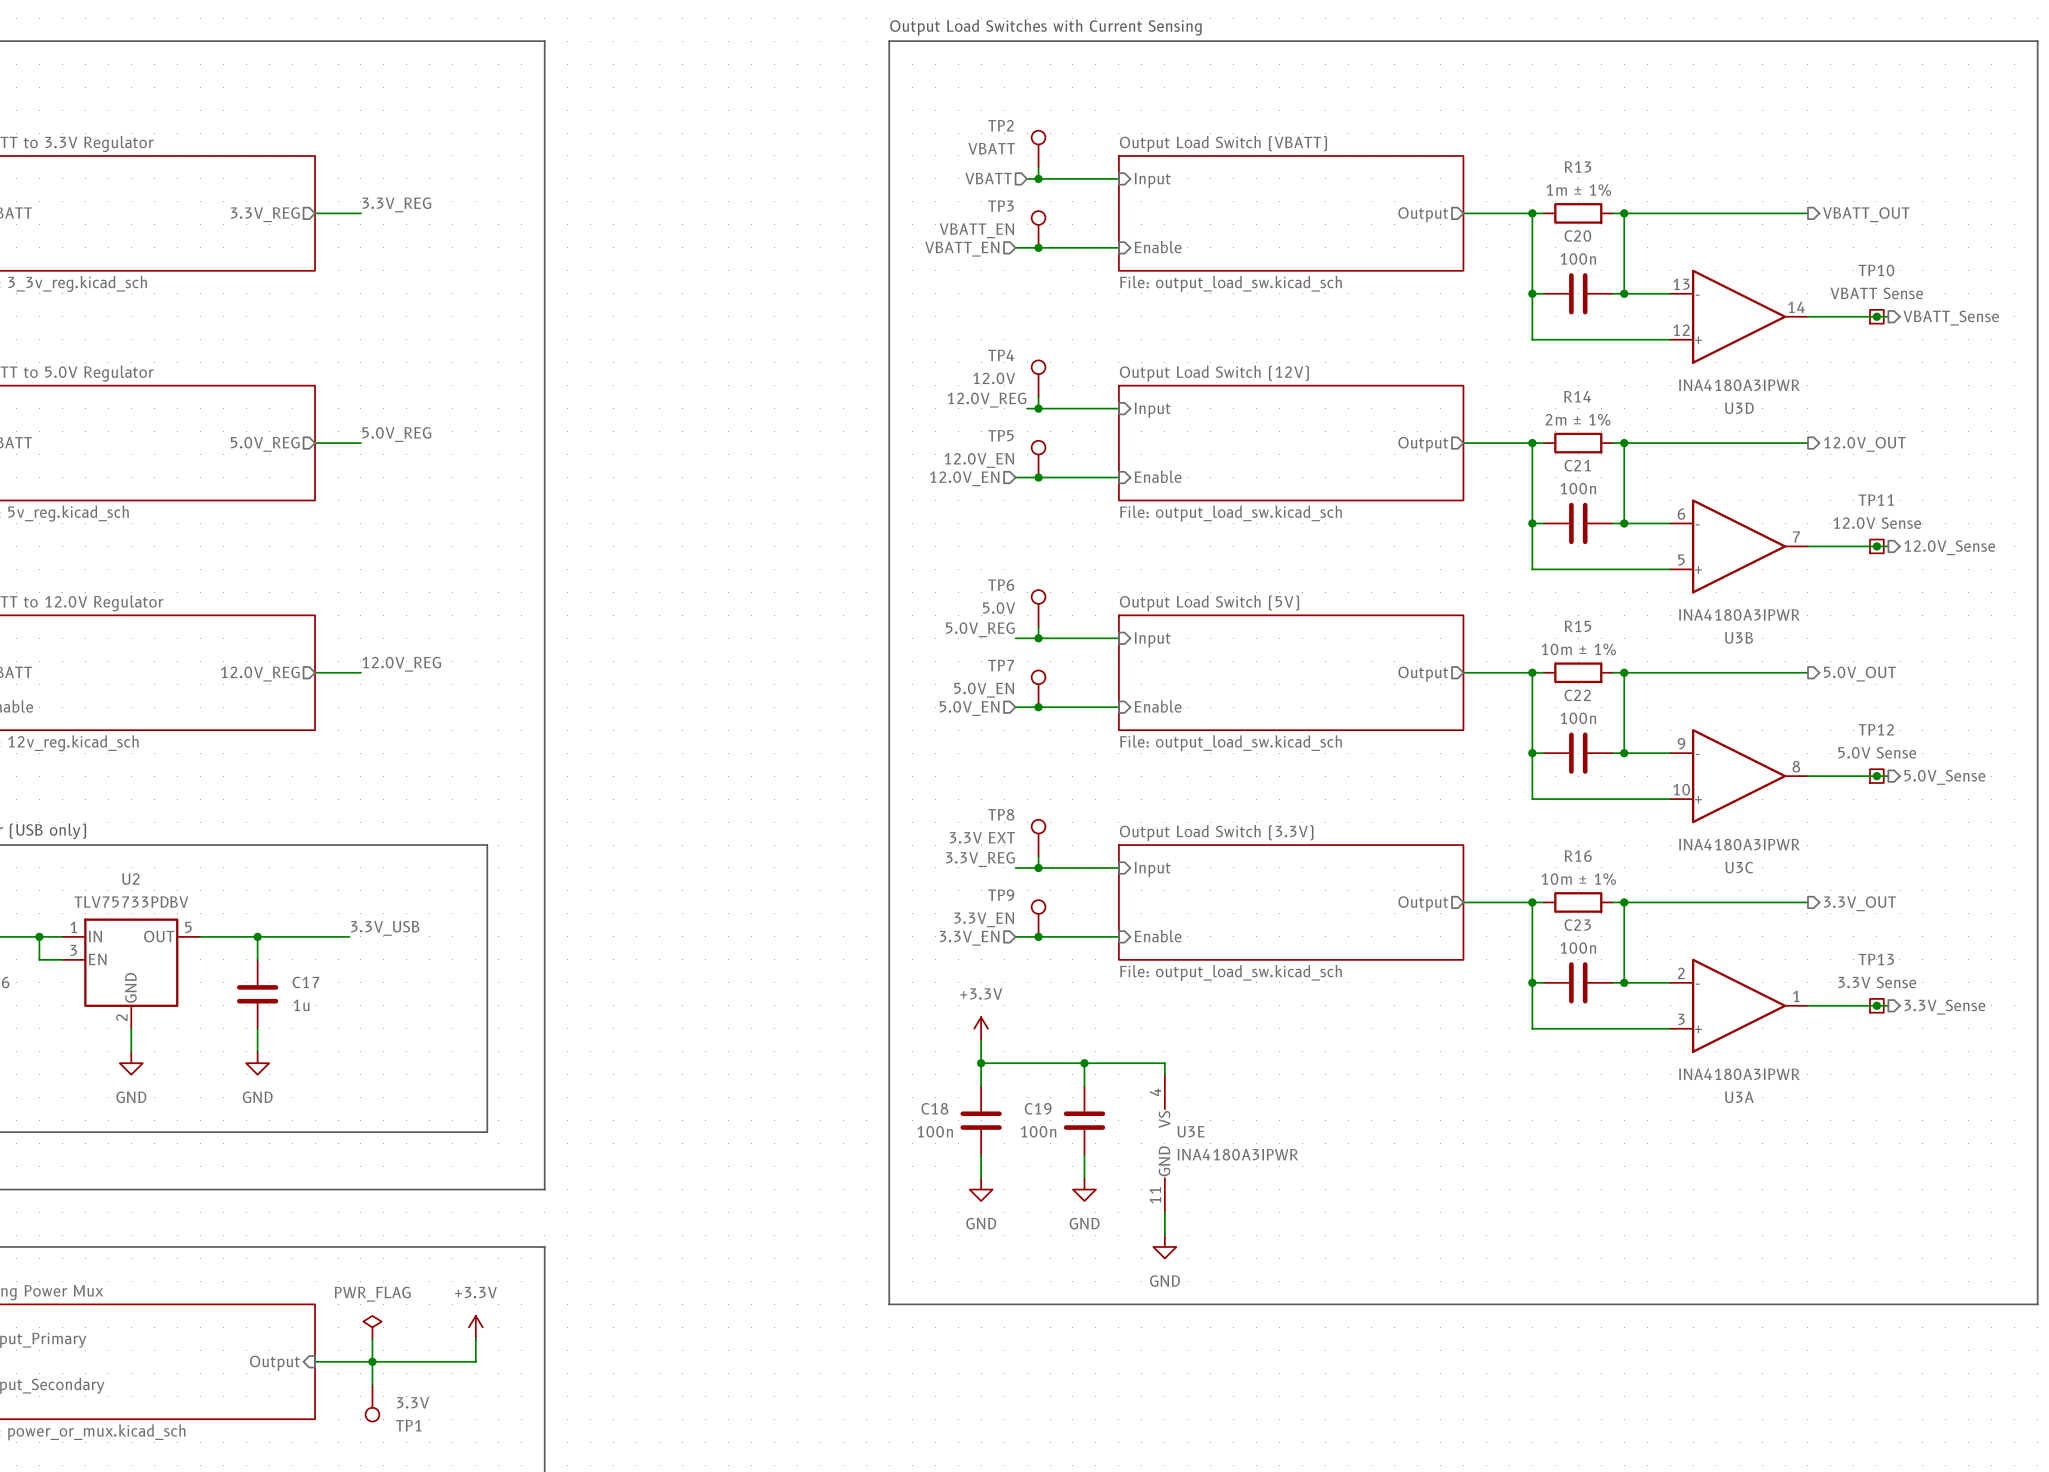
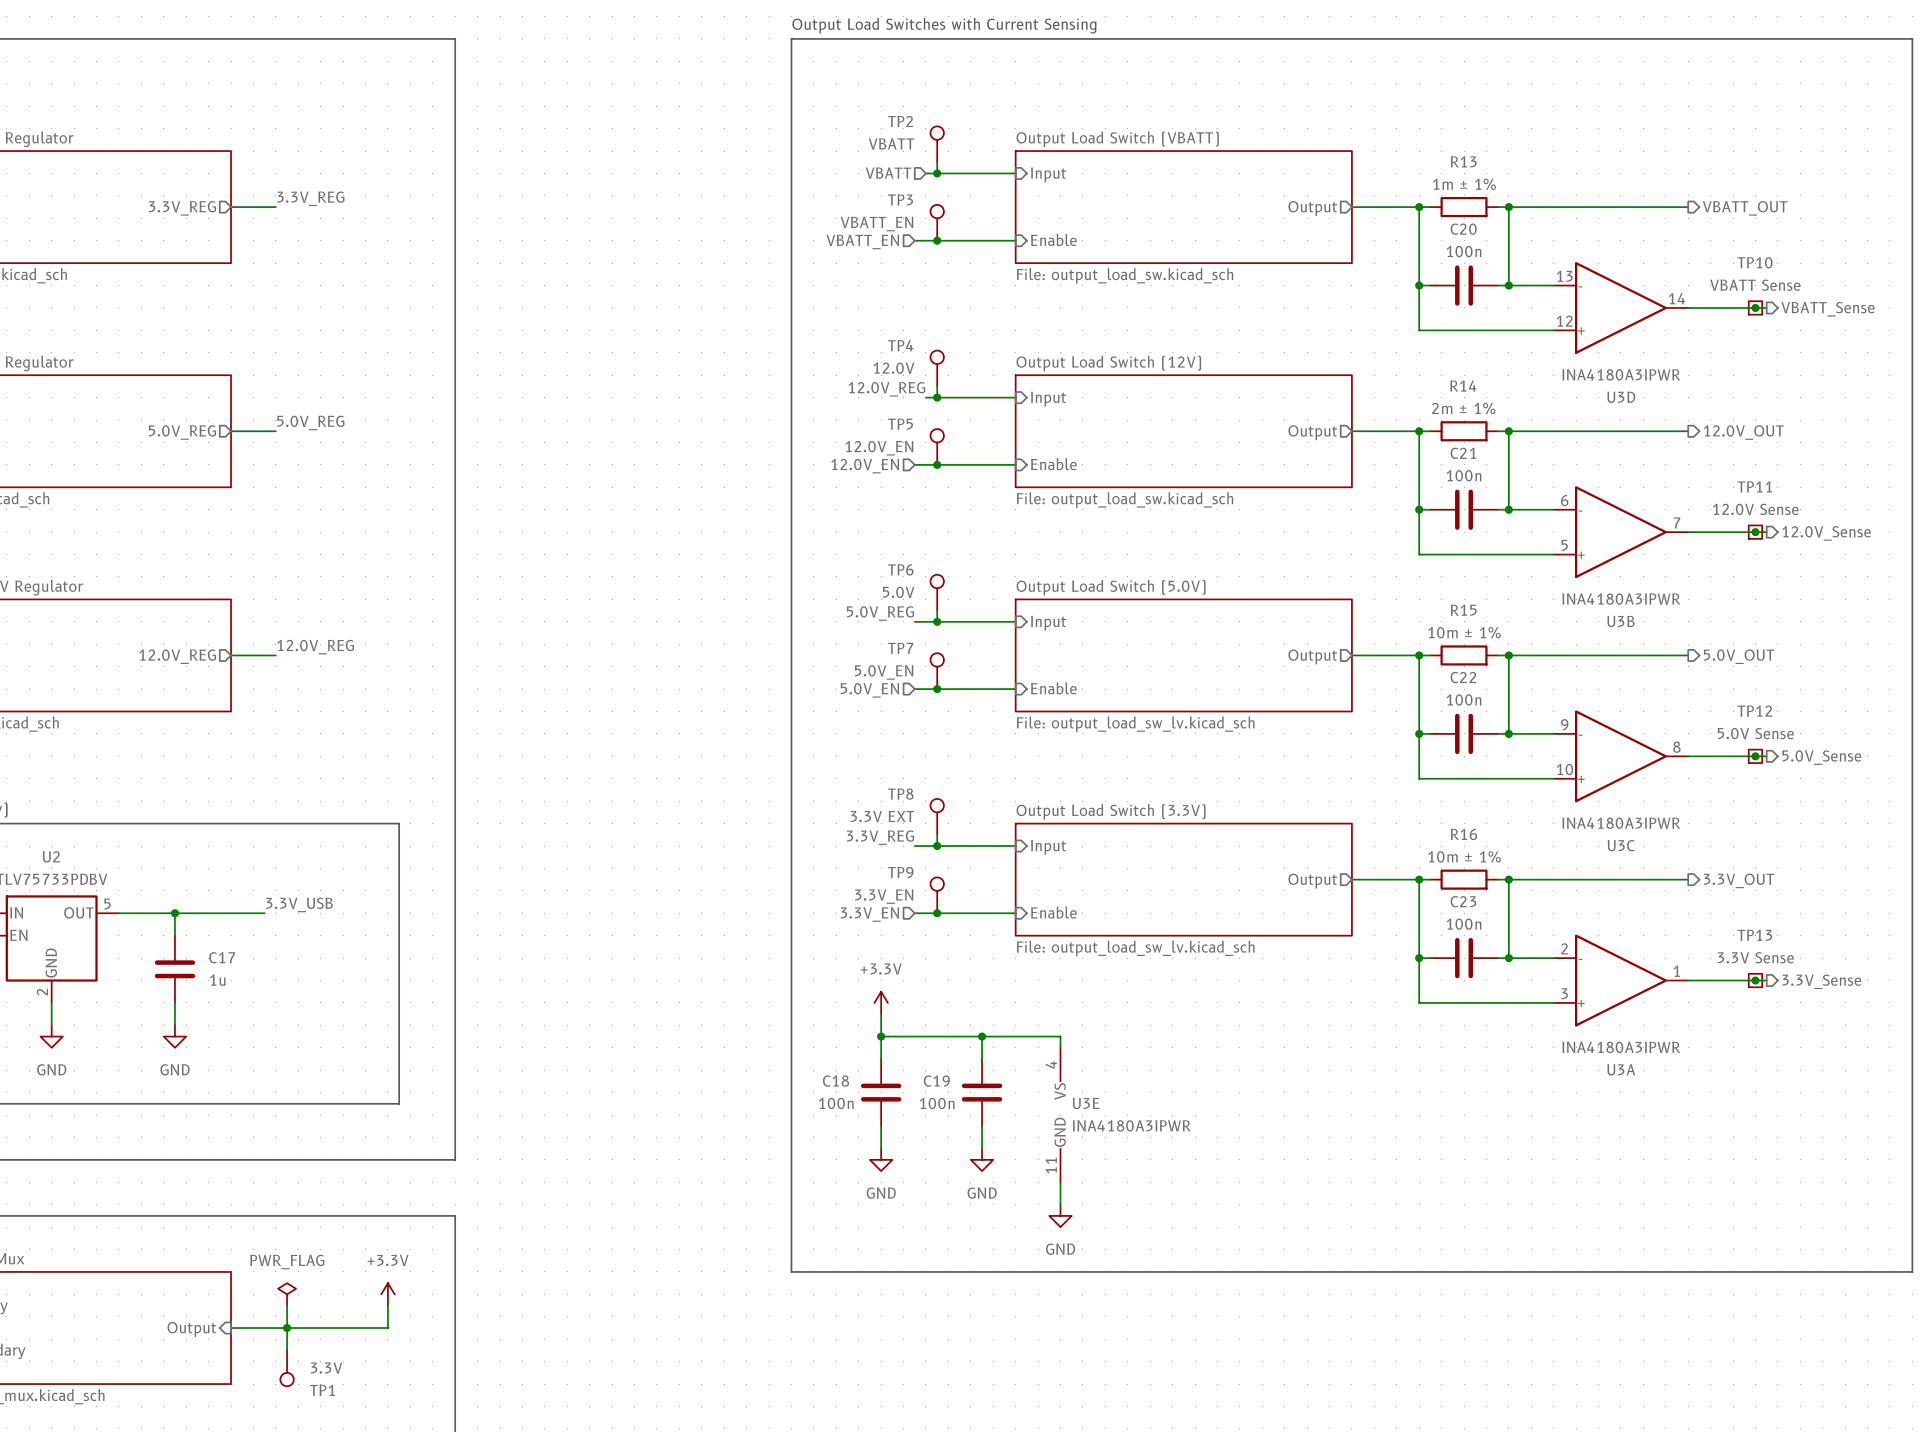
sheet Output Load Switch (5V) name: Output Load Switch (5V) (1209, 603) -> Output Load Switch (5.0V) (1111, 587)
sheet Output Load Switch (5V) value: File: output_load_sw.kicad_sch (1230, 743) -> File: output_load_sw_lv.kicad_sch (1135, 724)
sheet Output Load Switch (3.3V) value: File: output_load_sw.kicad_sch (1230, 972) -> File: output_load_sw_lv.kicad_sch (1135, 948)

